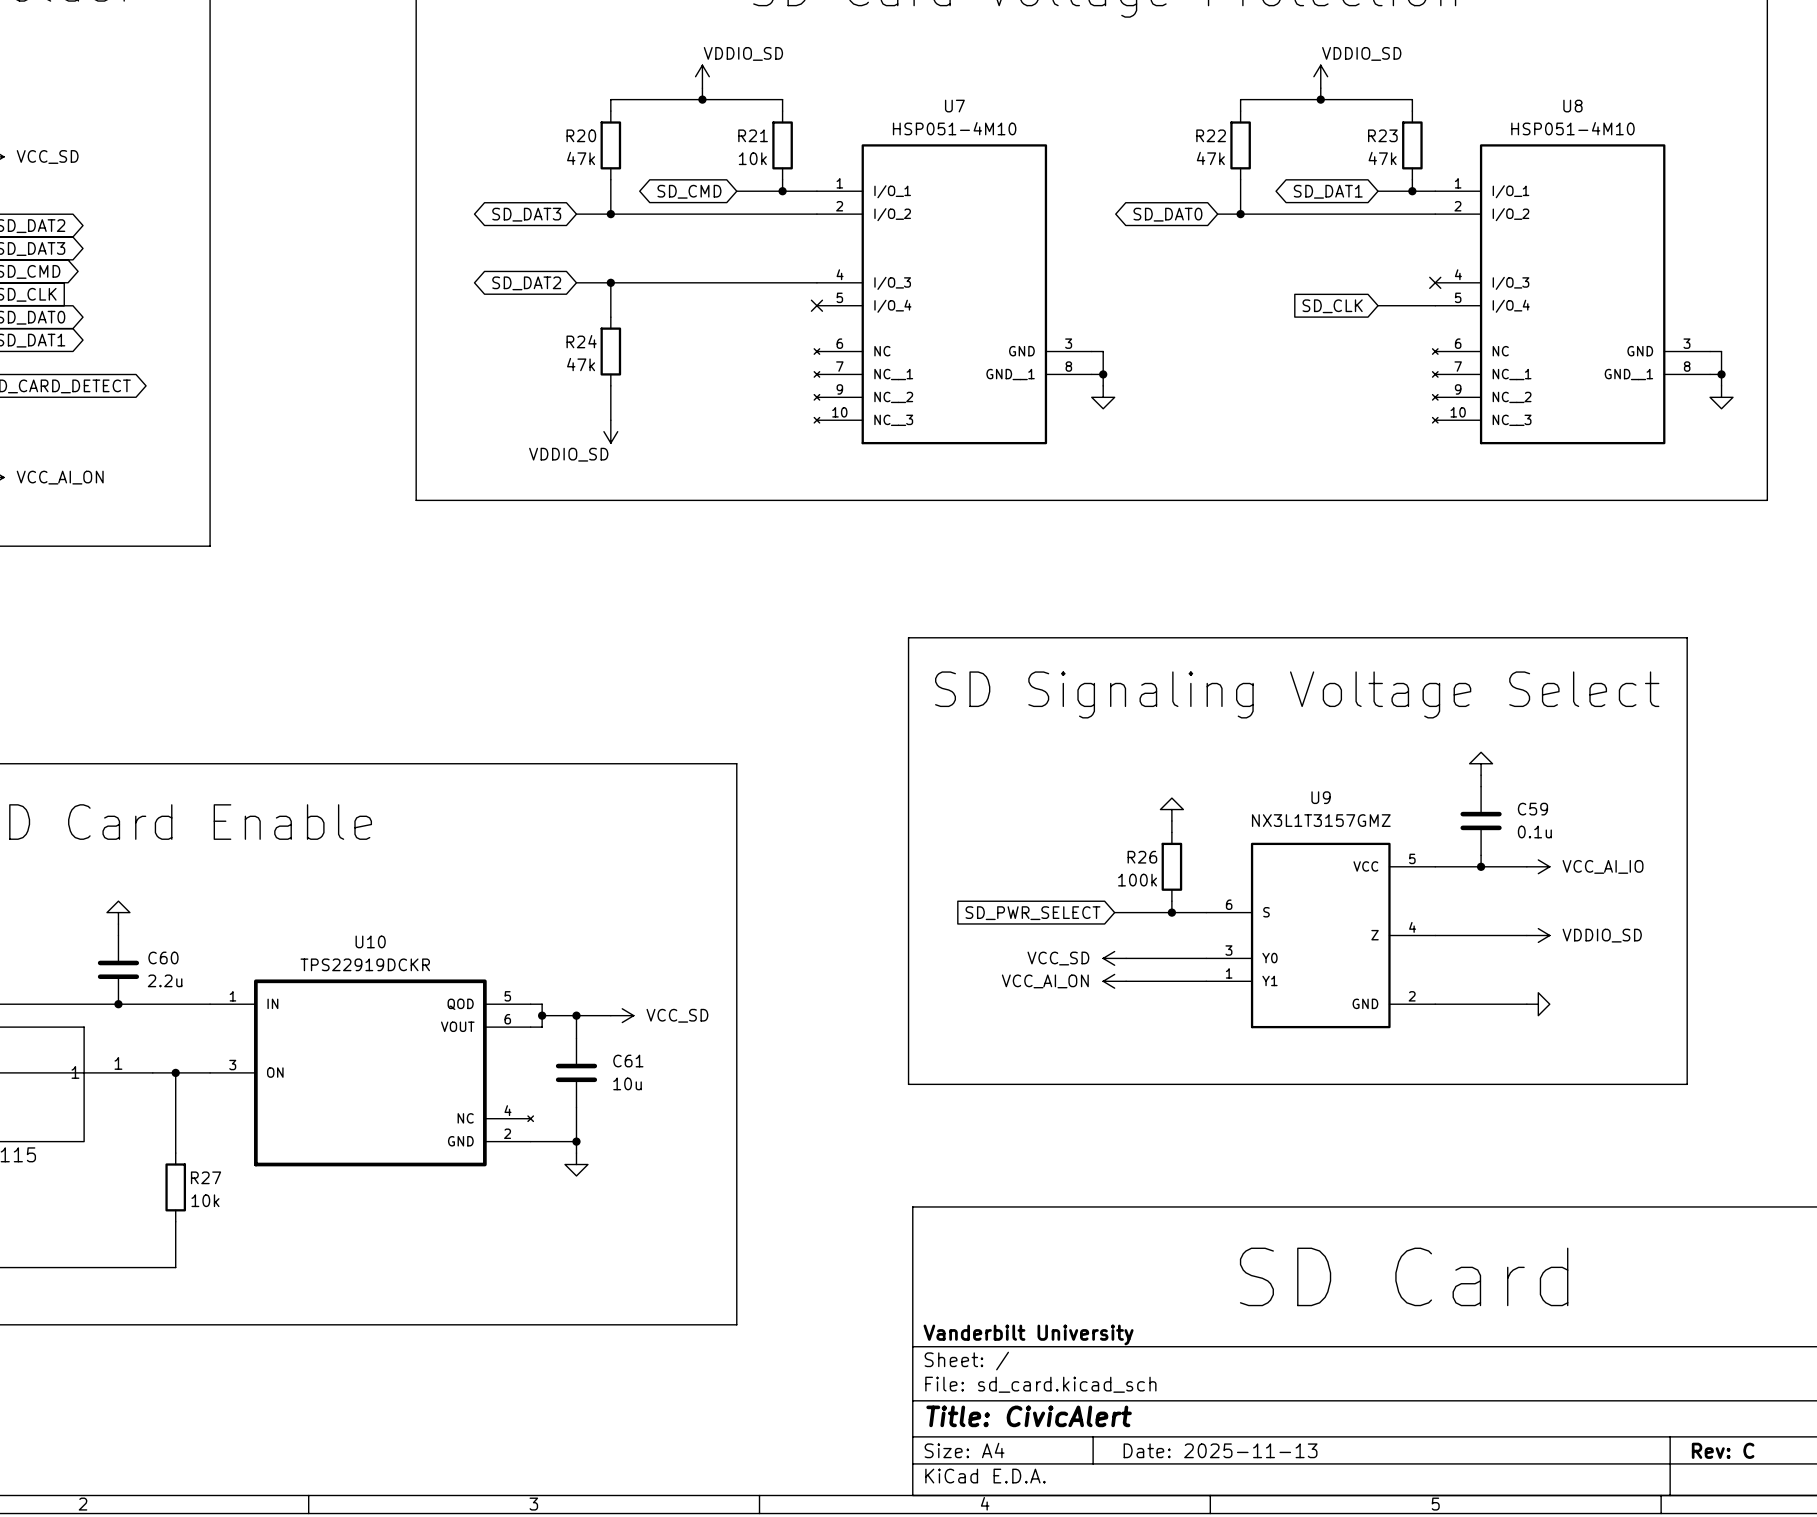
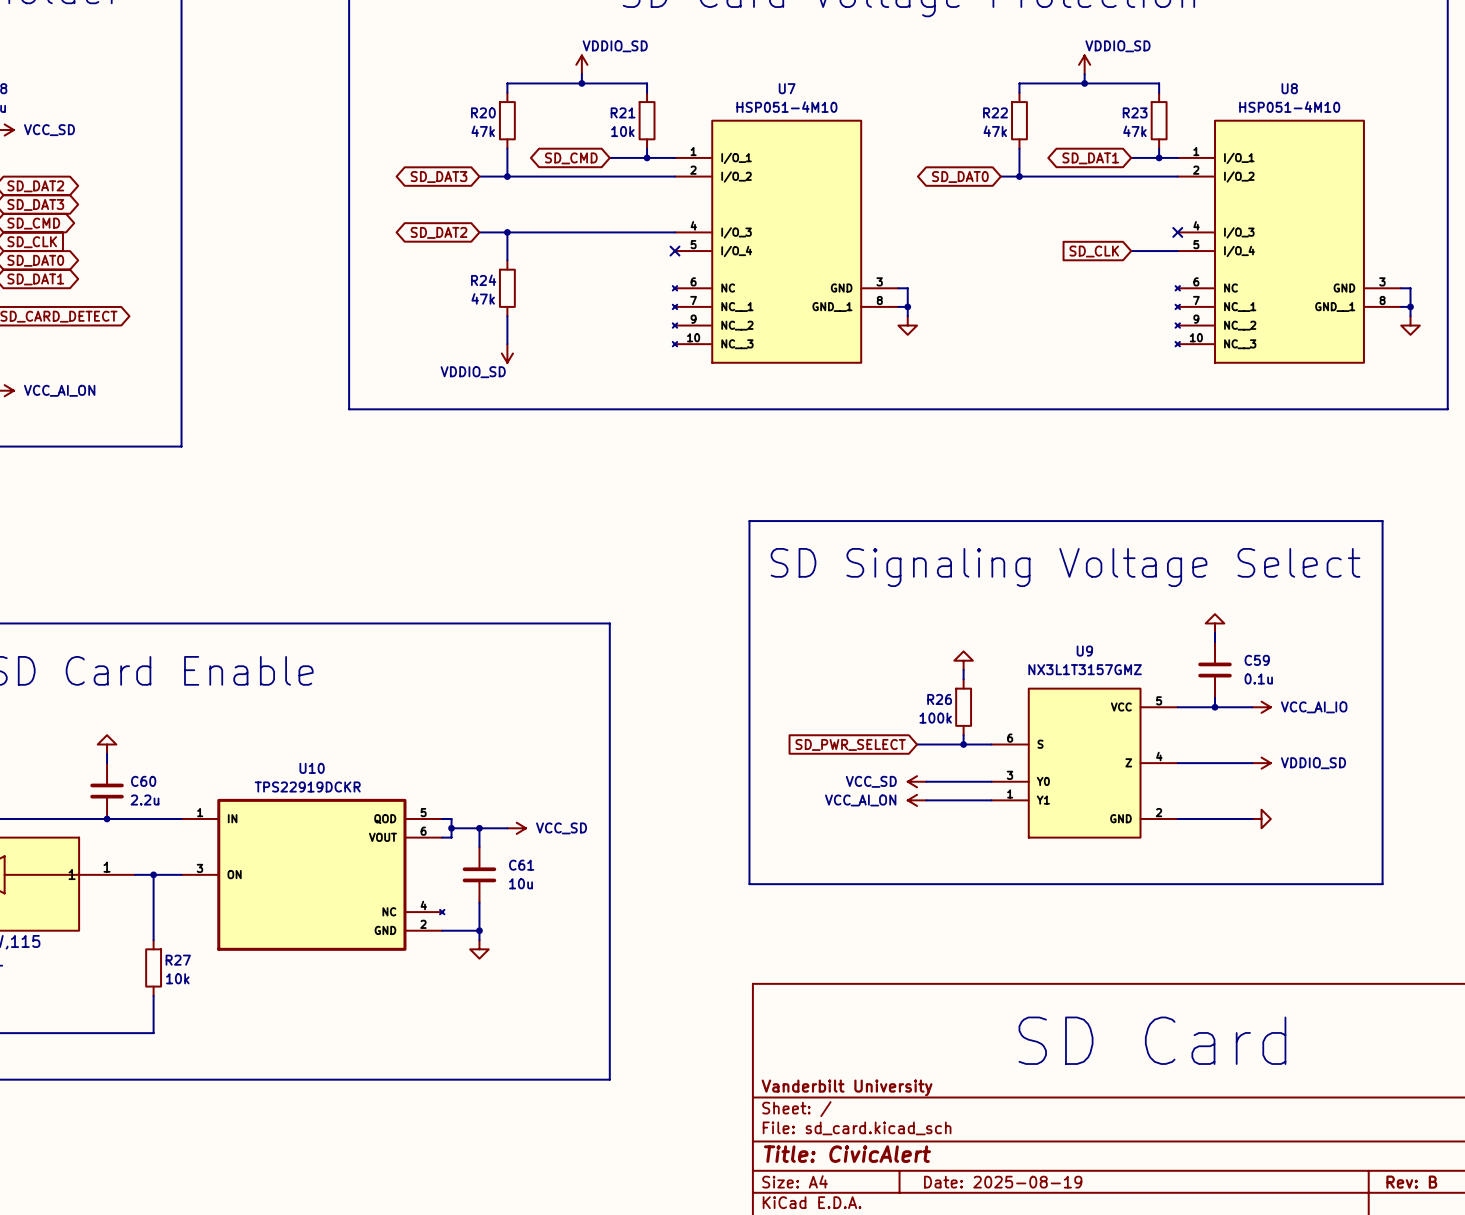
title block: Date: 2025-11-13 (1220, 1450) -> Date: 2025-08-19 (1003, 1182)
title block: Rev: C (1723, 1450) -> Rev: B (1411, 1182)

